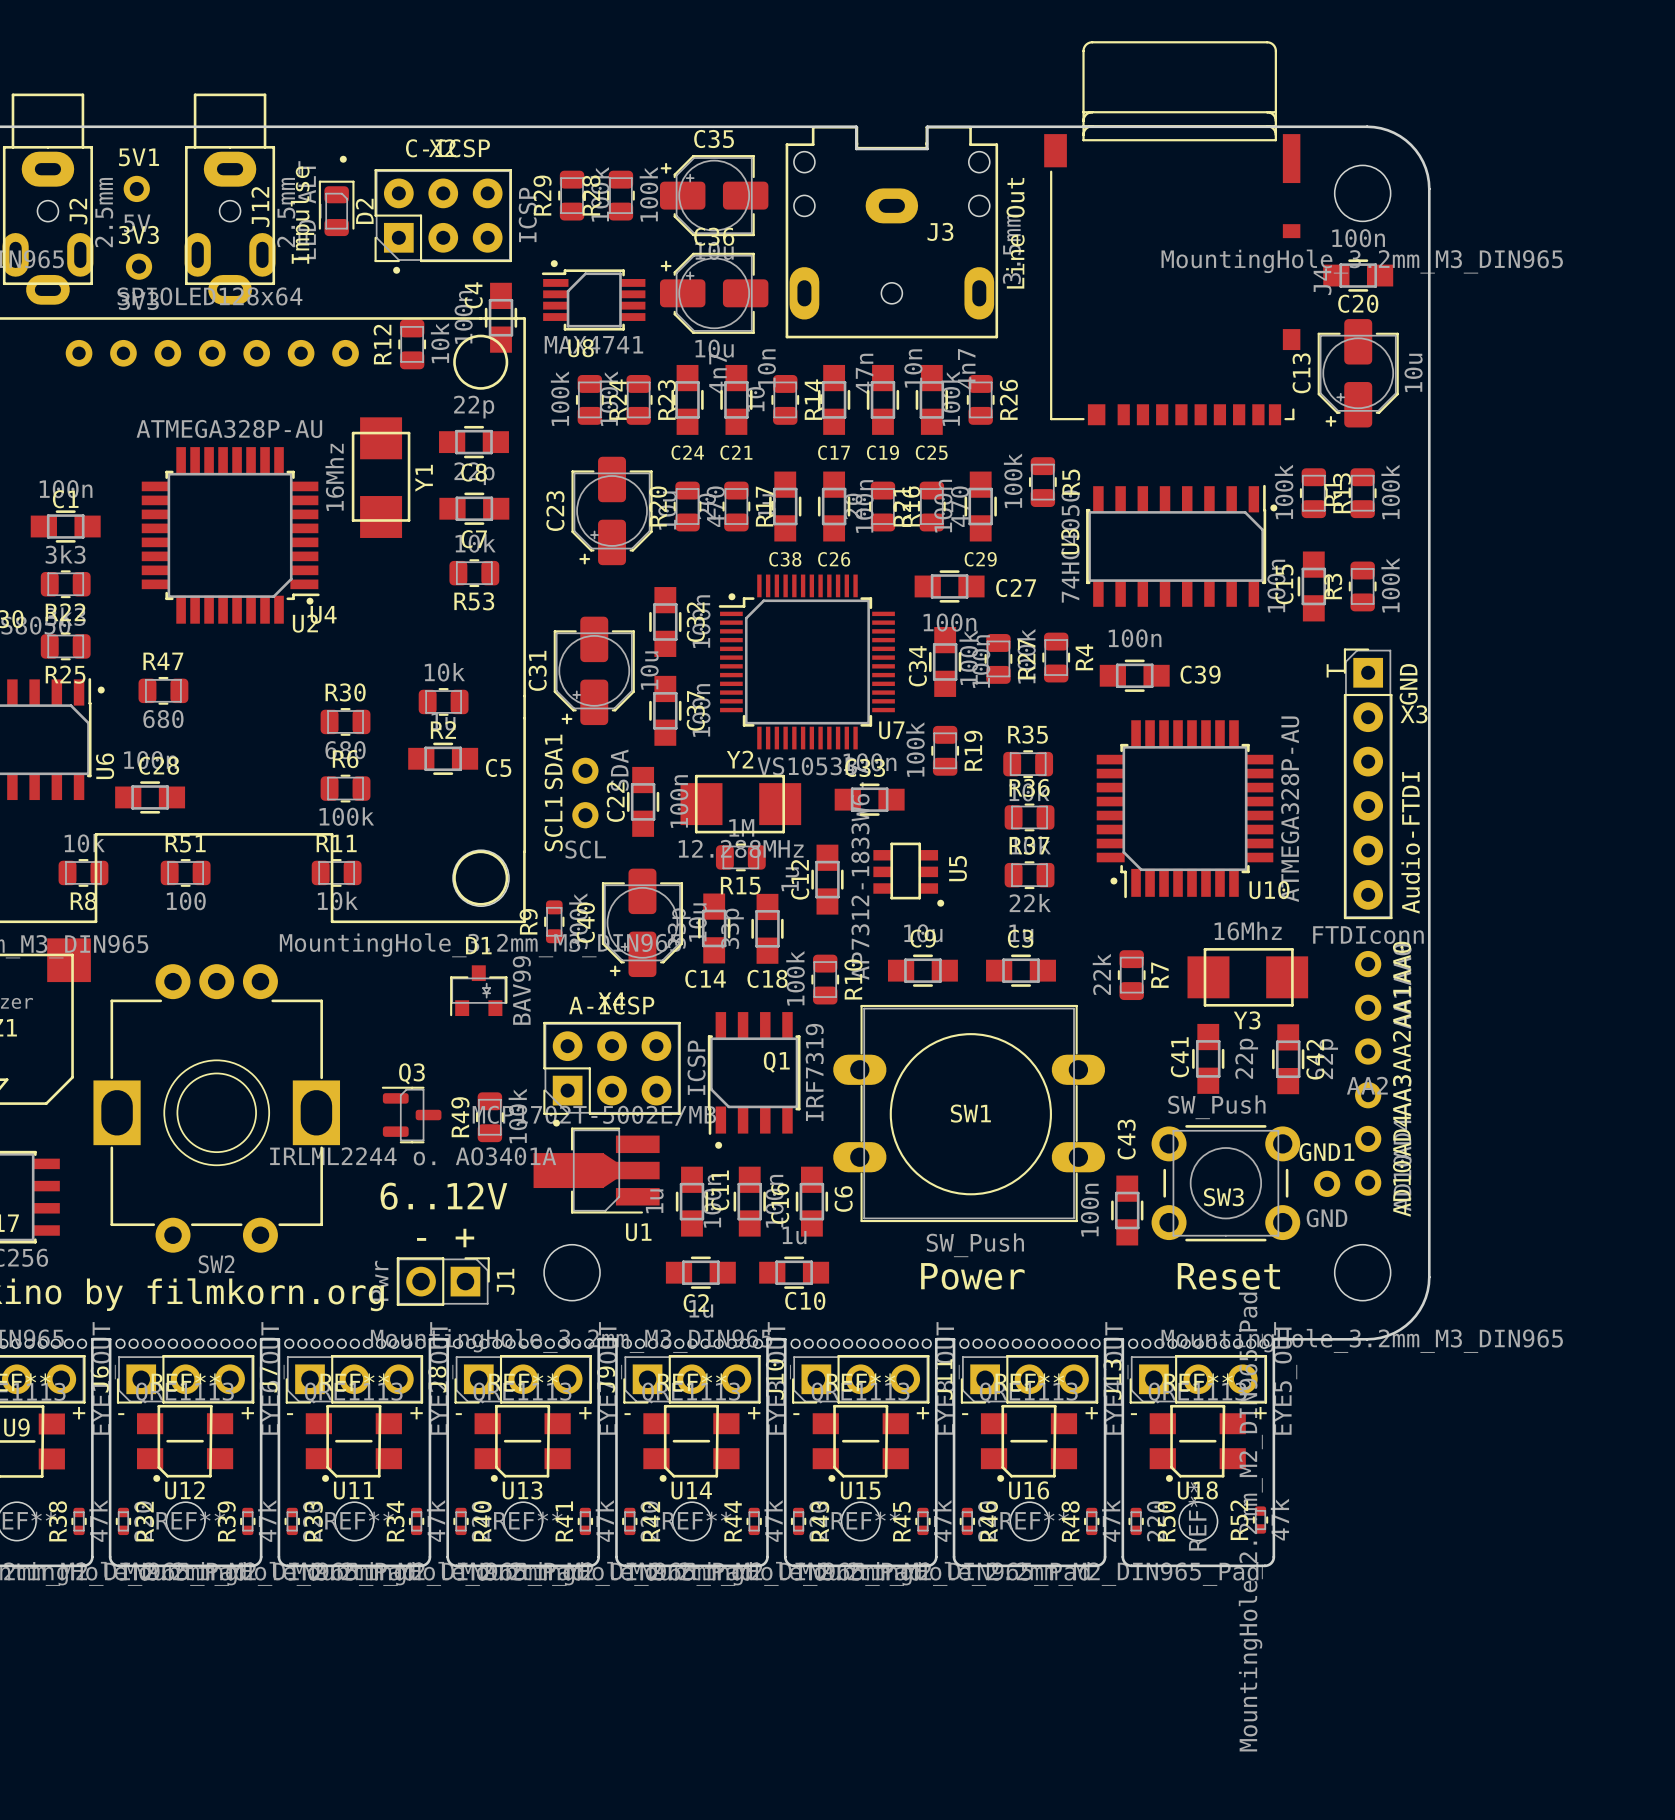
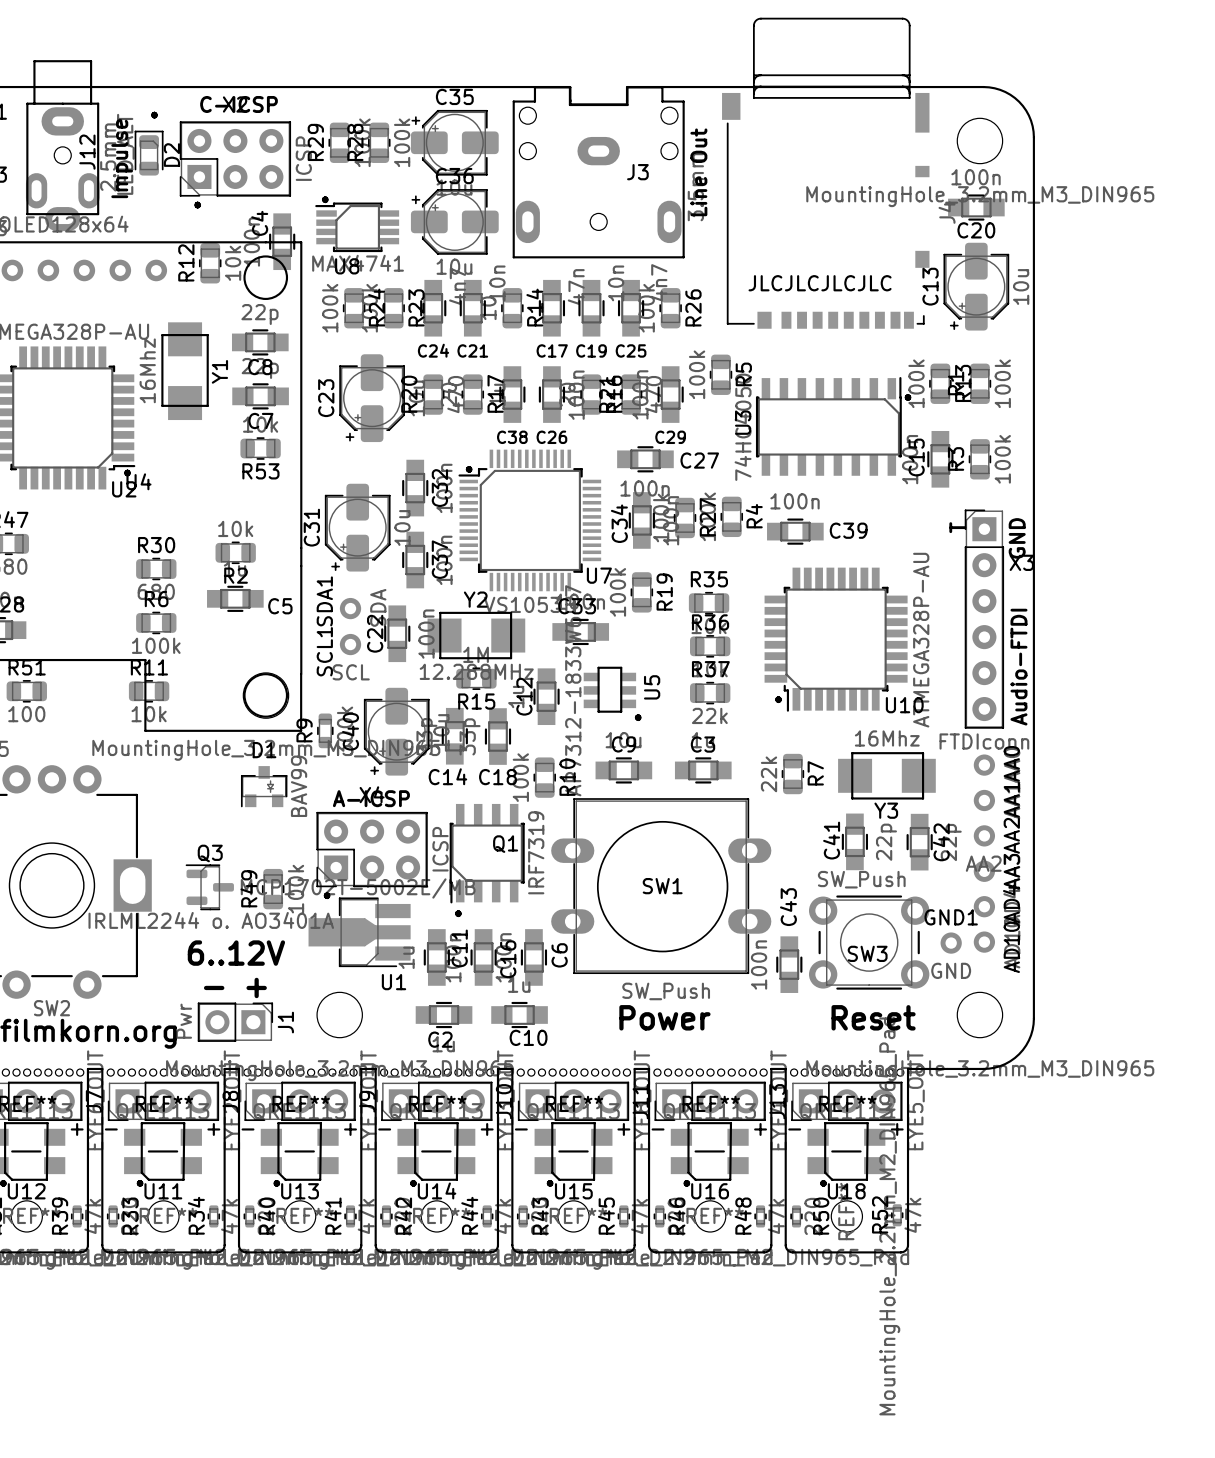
text: none -> JLCJLCJLCJLC (820, 283)

